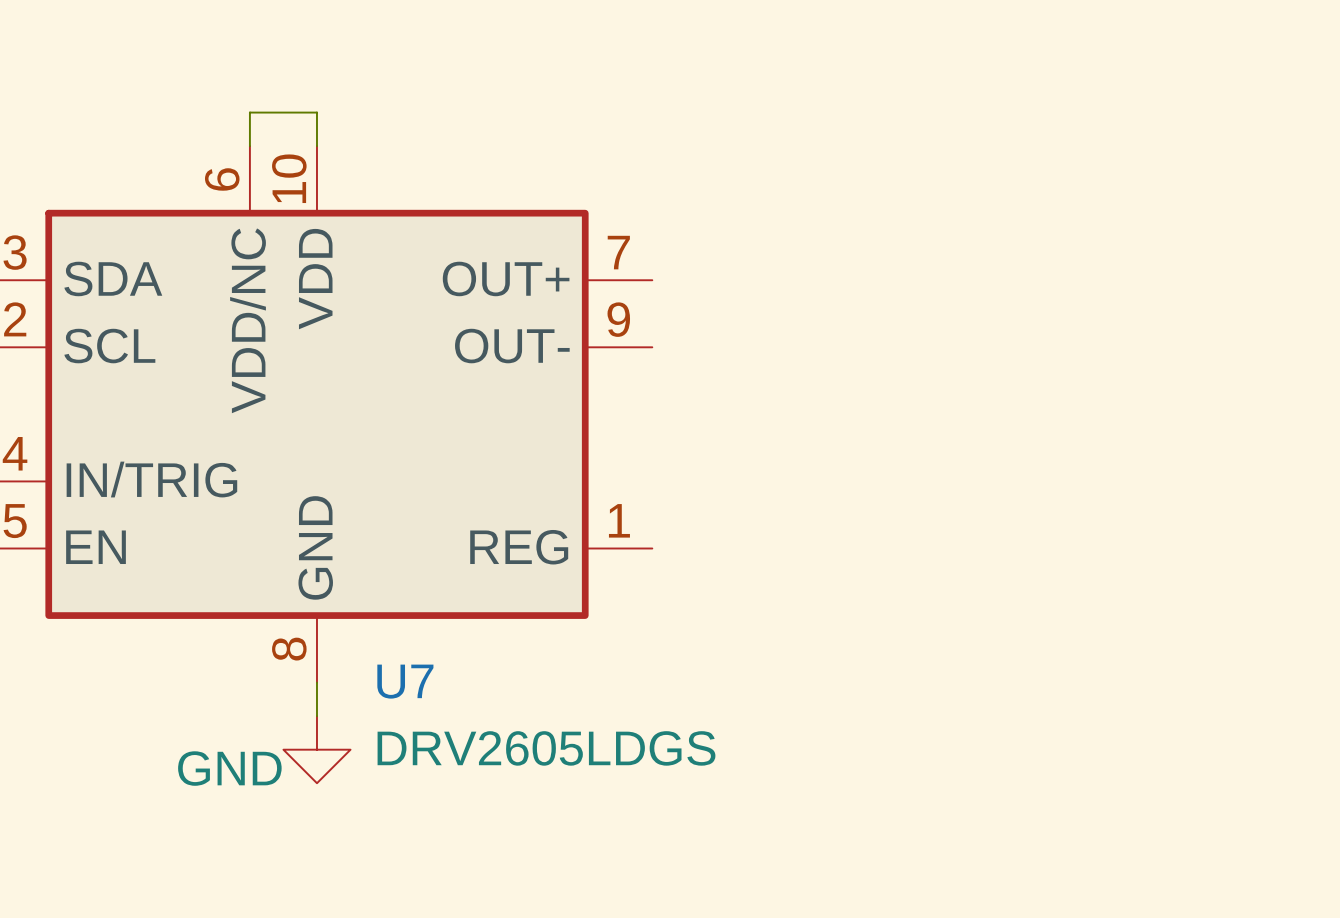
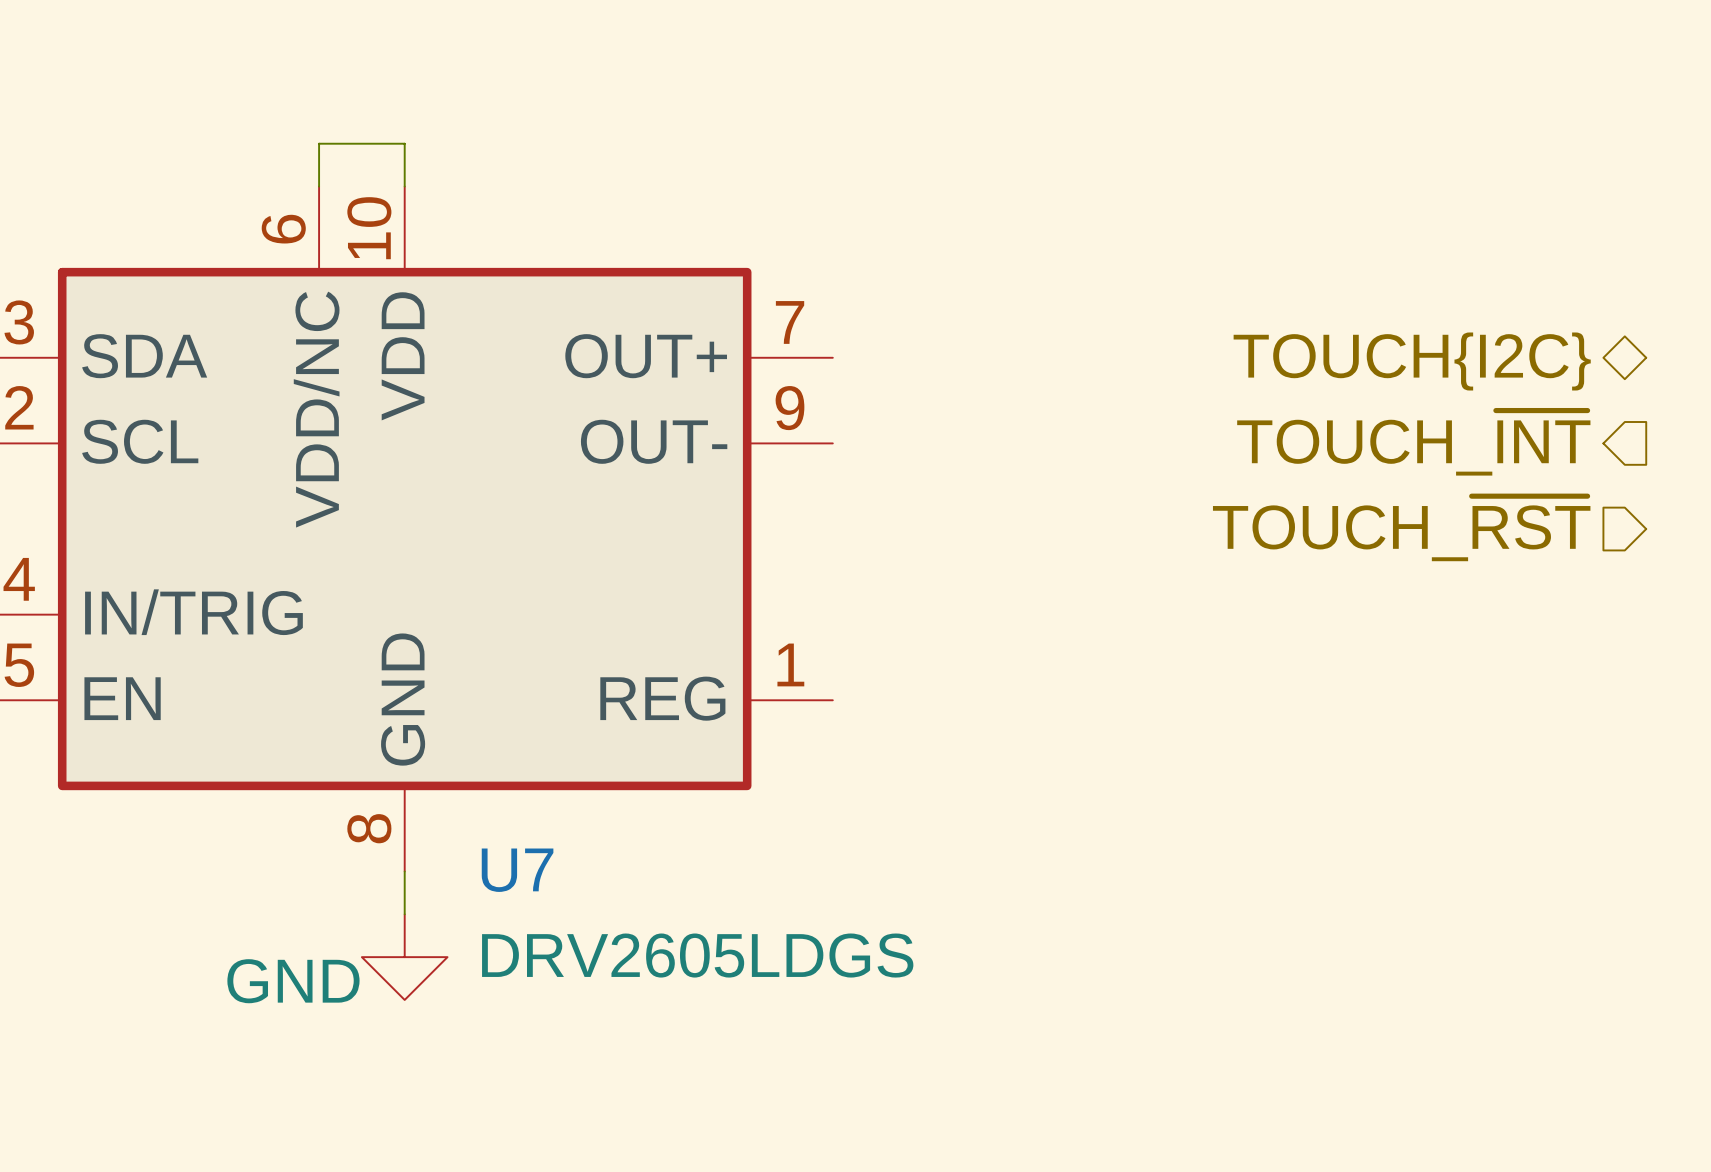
hierarchical label: none -> TOUCH{I2C} (1412, 361)
hierarchical label: none -> TOUCH_~{INT} (1413, 443)
hierarchical label: none -> TOUCH_~{RST} (1401, 528)

